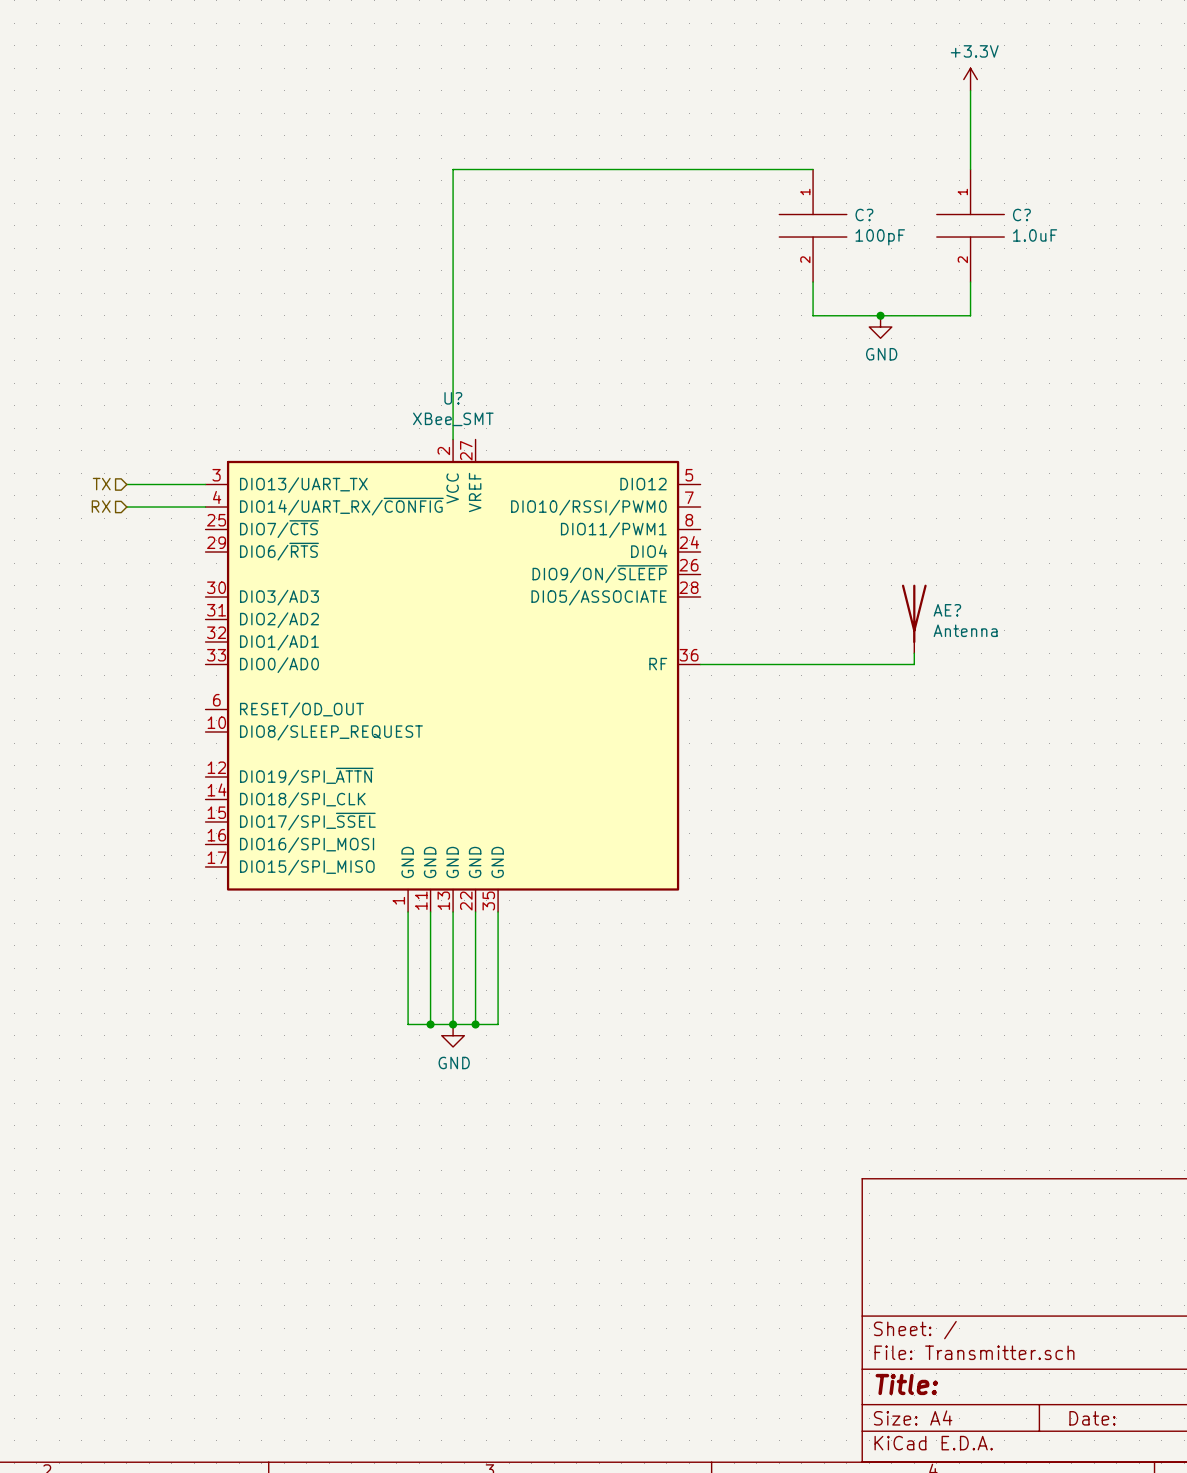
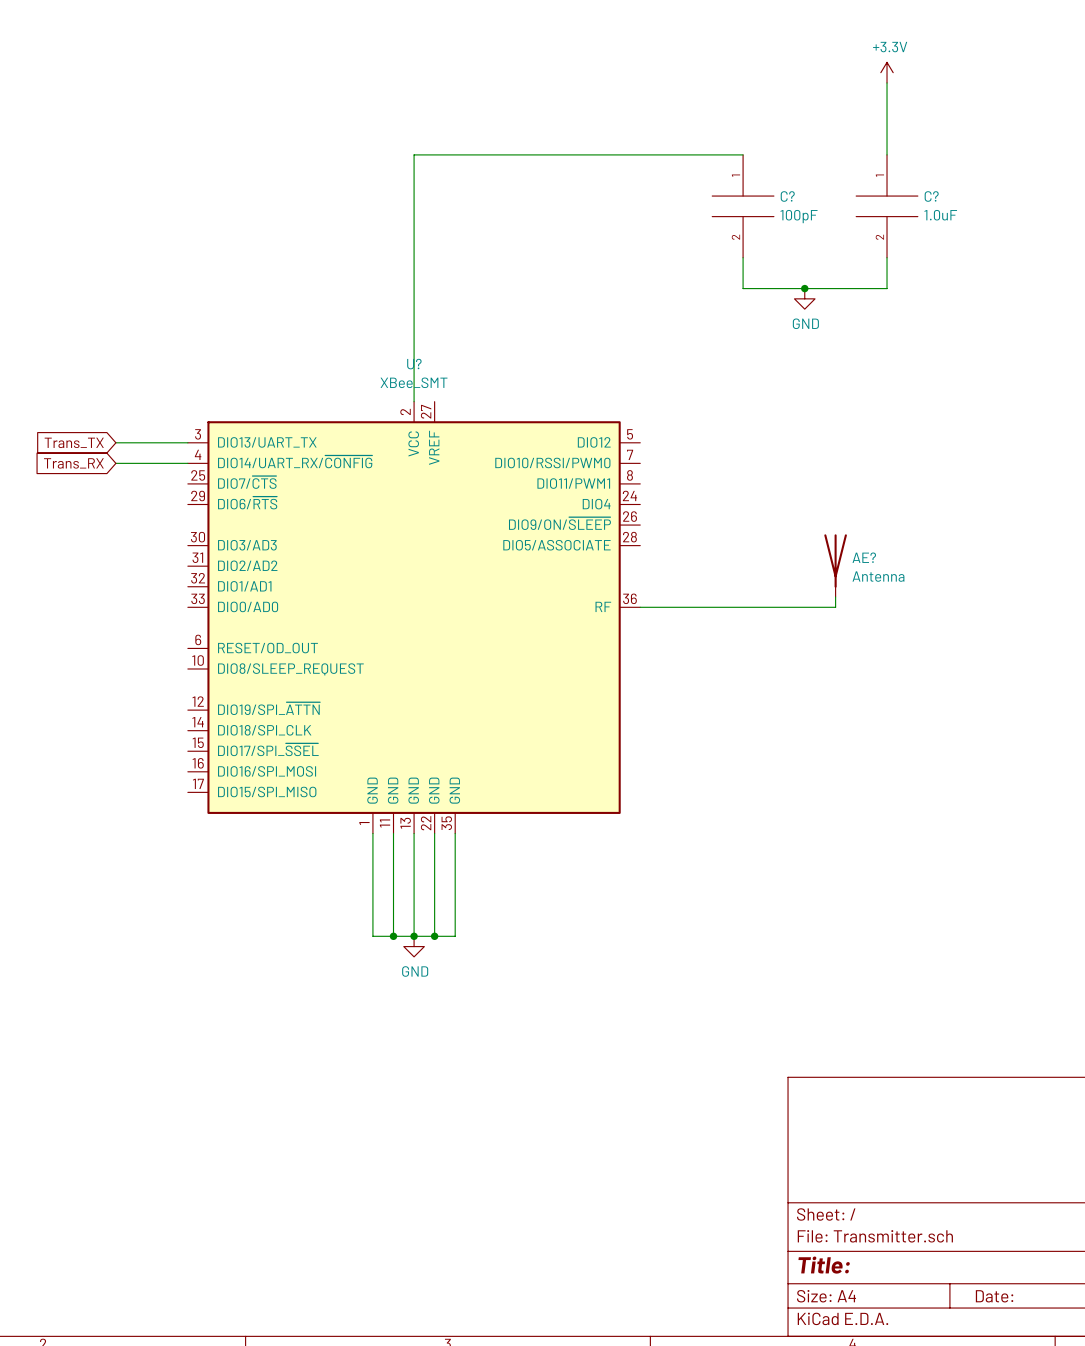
hierarchical label: TX (101, 484) -> none
global label: none -> Trans_TX (74, 442)
hierarchical label: RX (101, 506) -> none
global label: none -> Trans_RX (73, 463)

